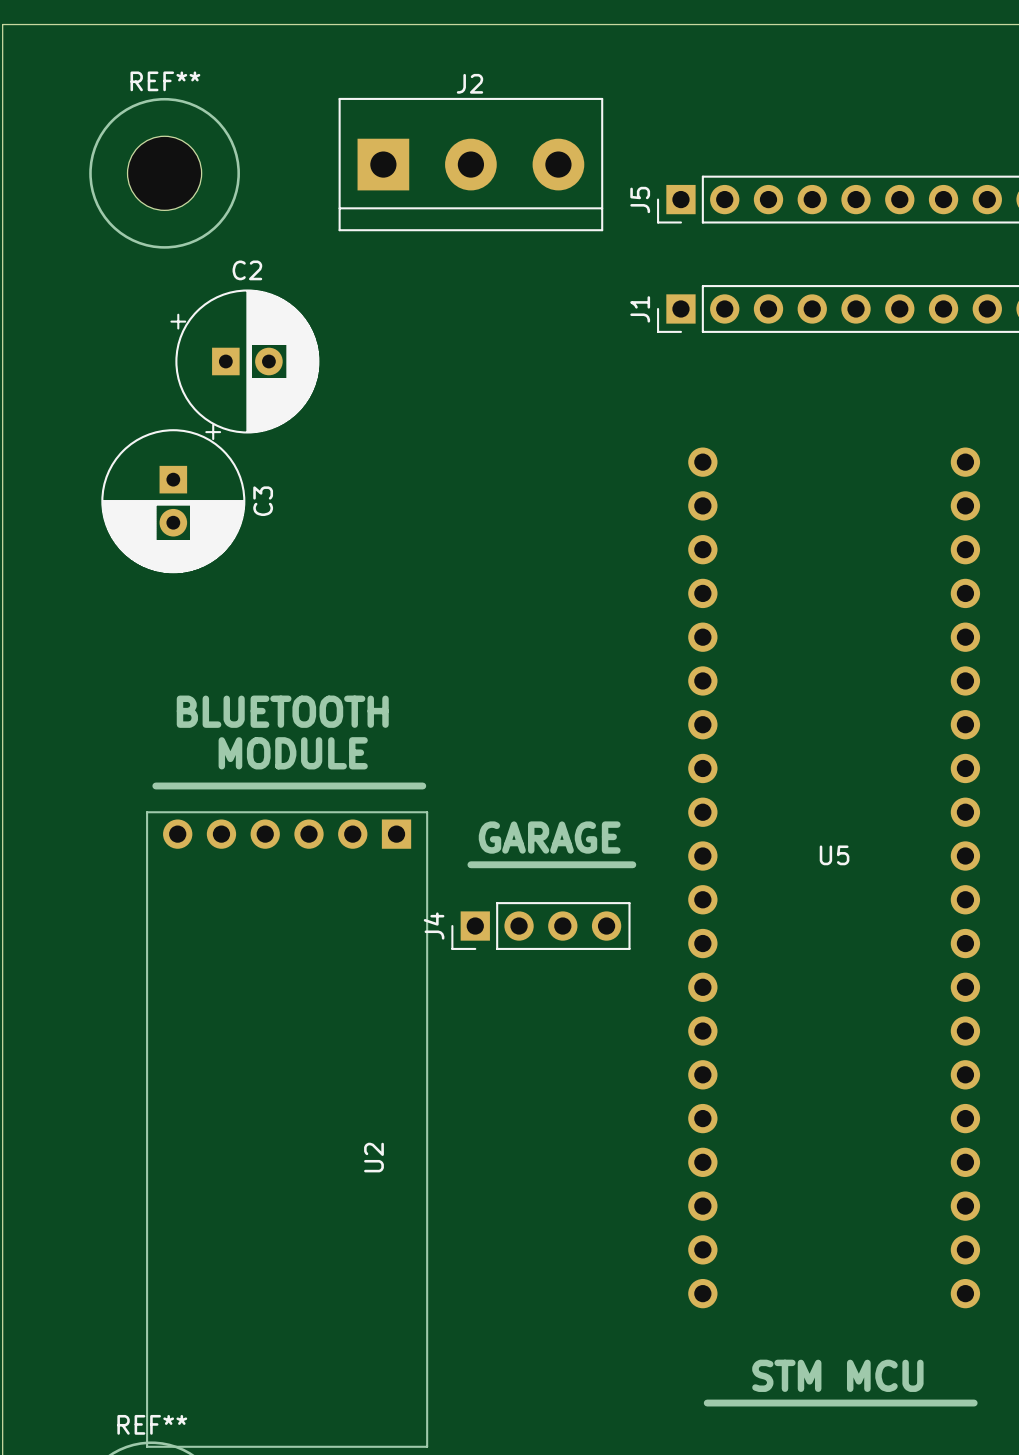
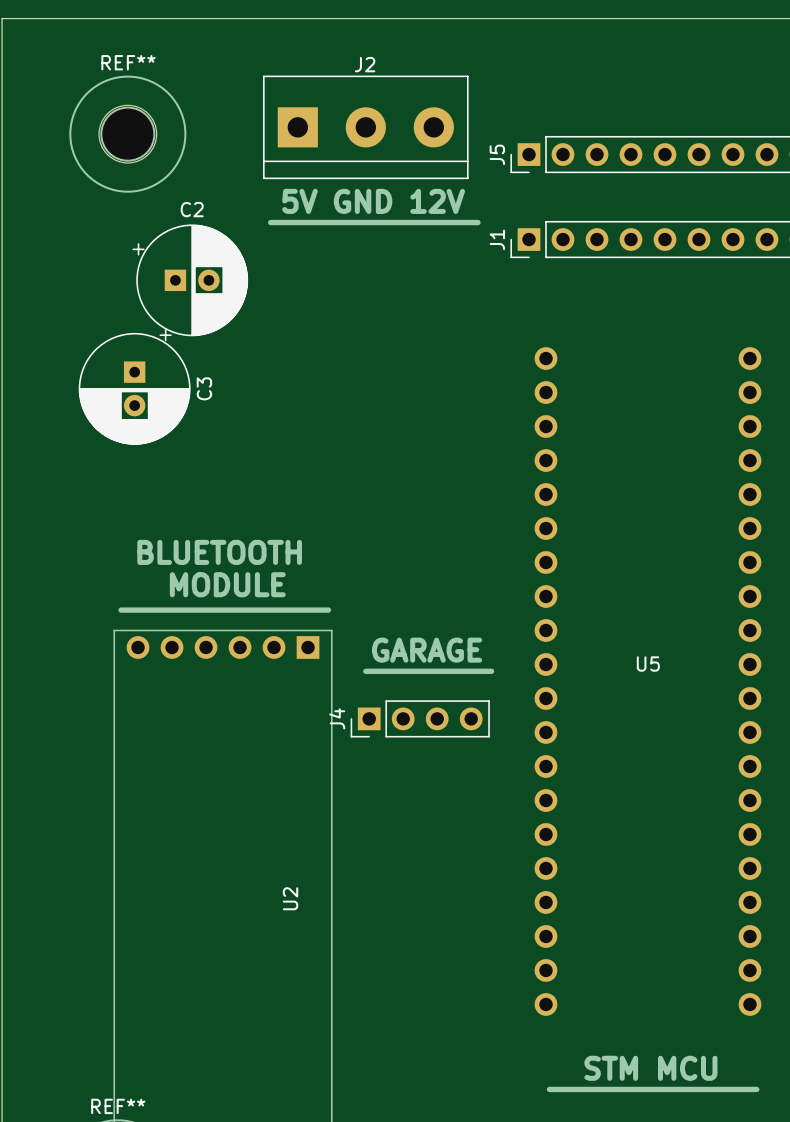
drawing: none -> [100, 106, 156, 162]
text: none -> 5V GND 12V (373, 201)
line: none -> (270, 222) (478, 222)

